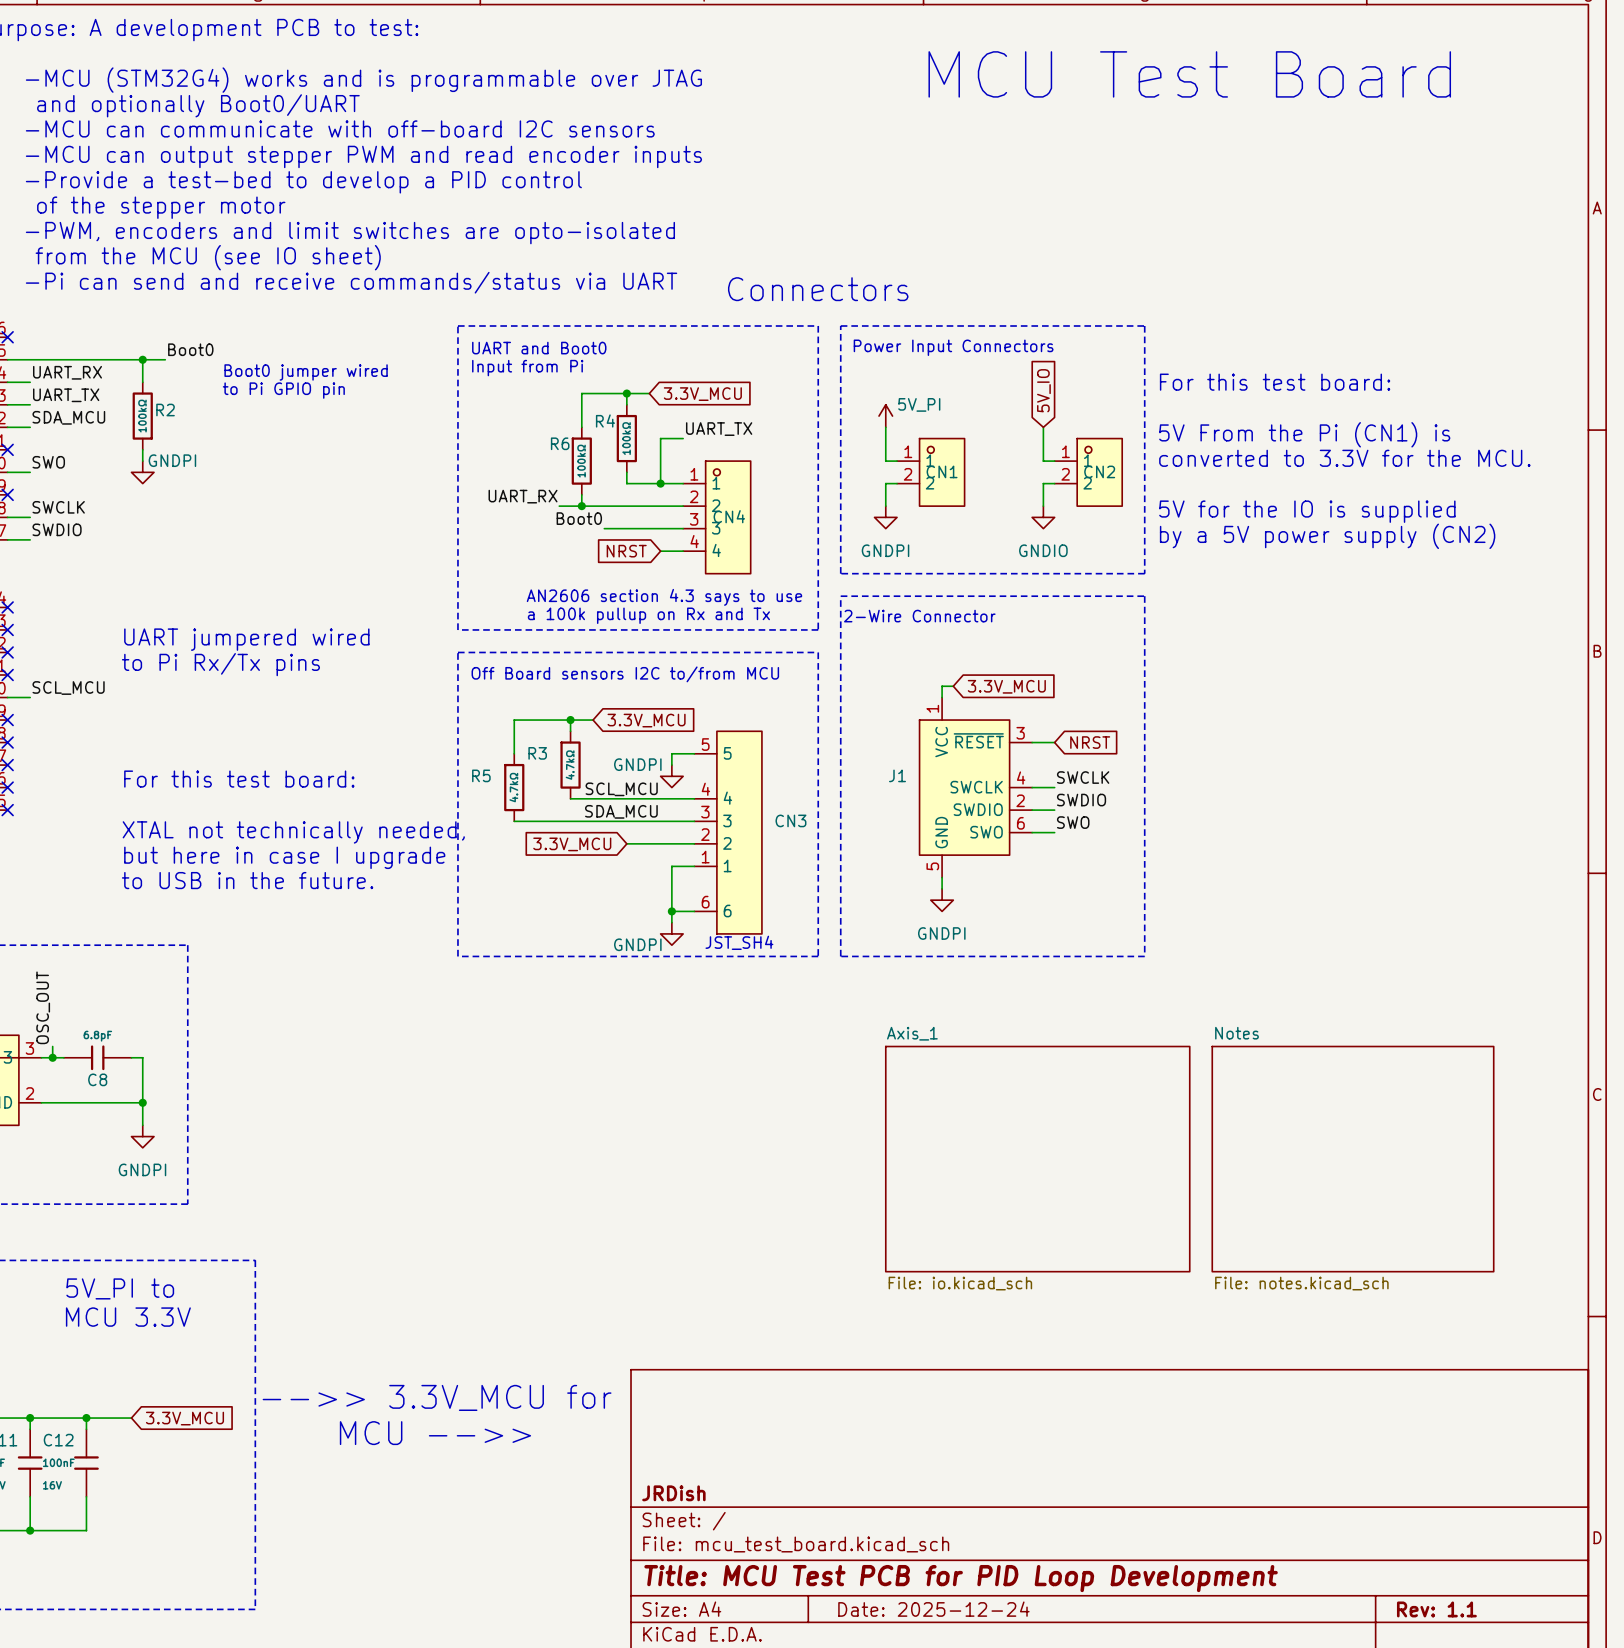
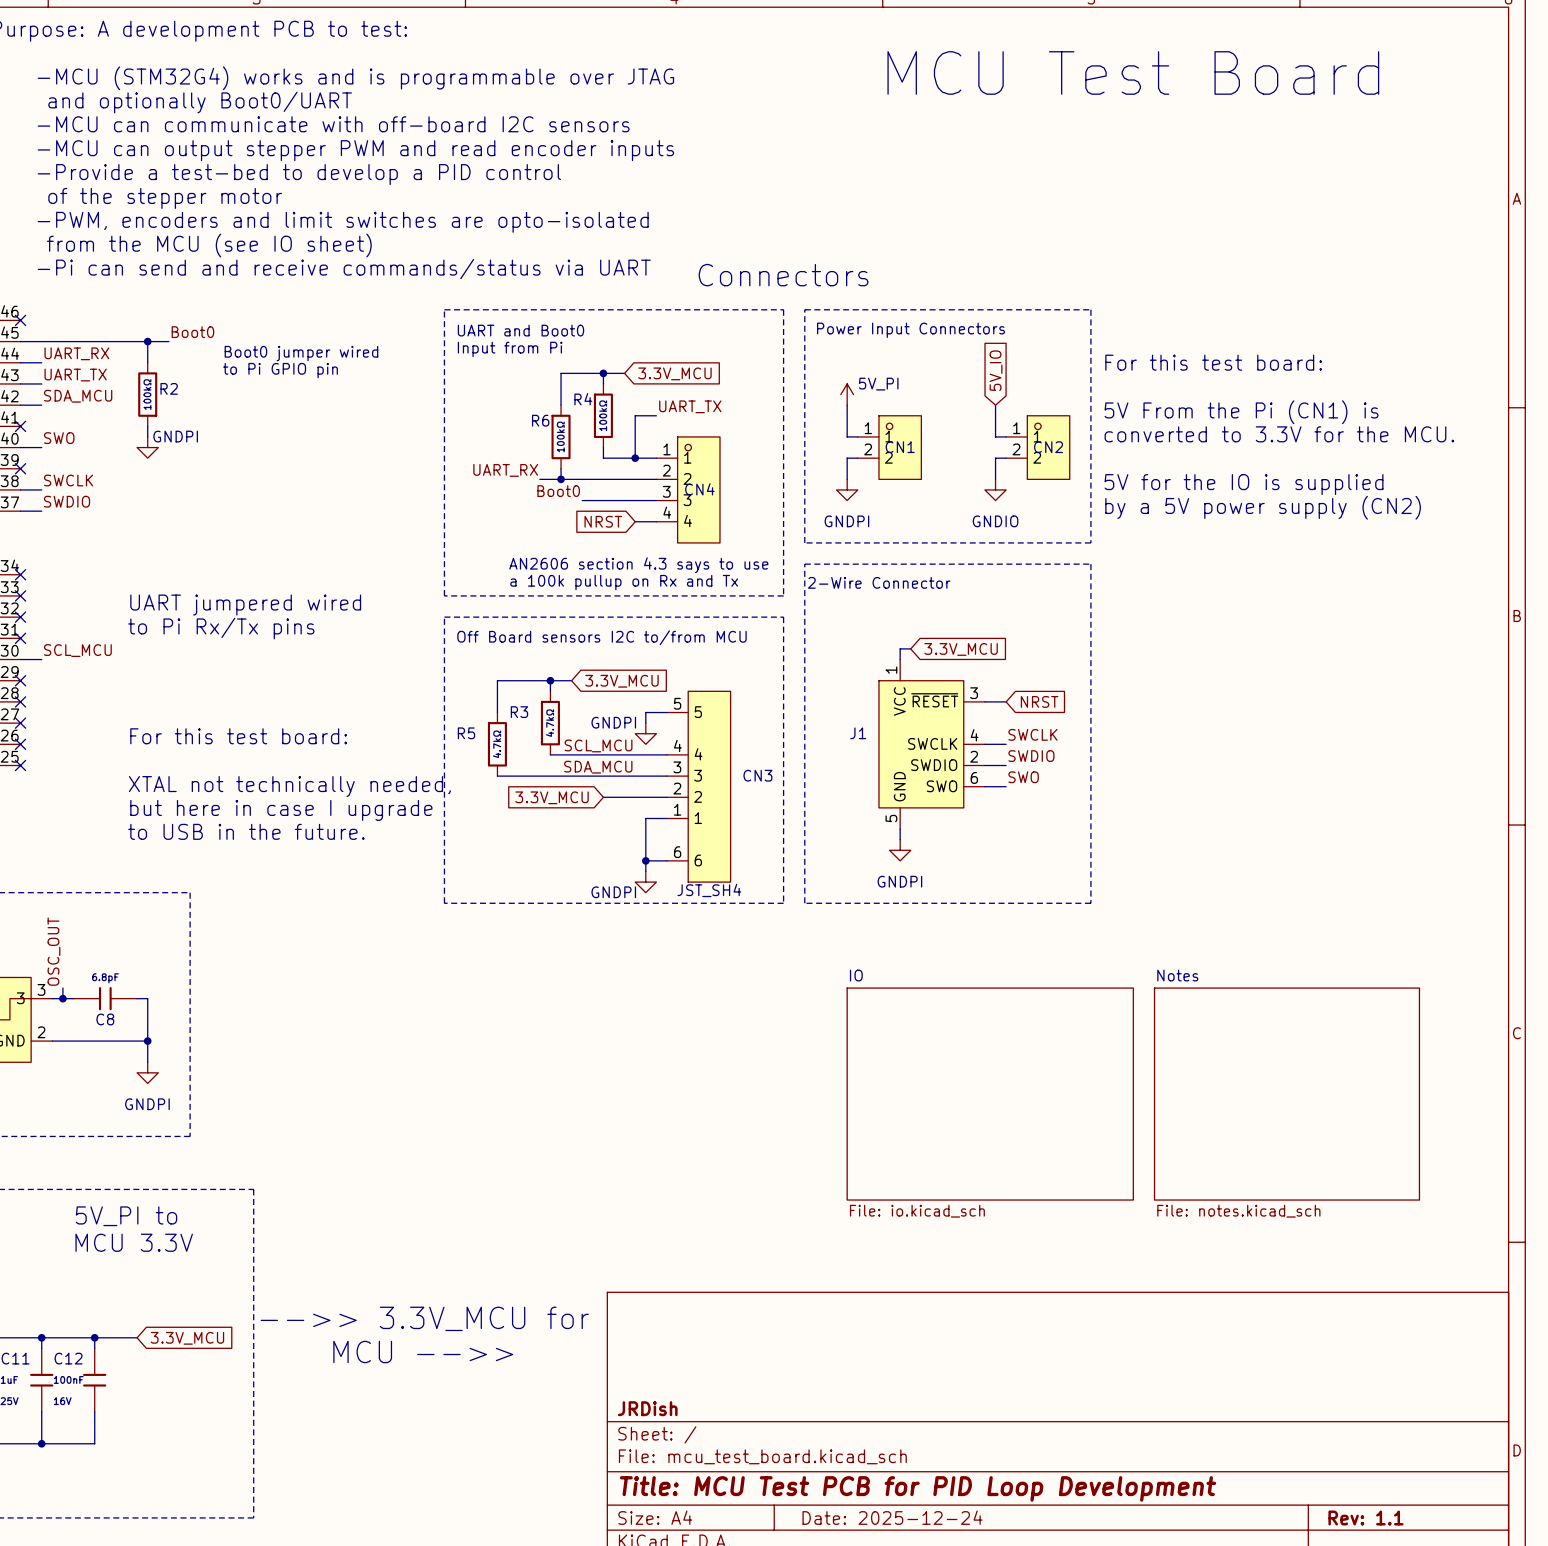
sheet Axis_1 name: Axis_1 (912, 1033) -> IO (856, 975)

